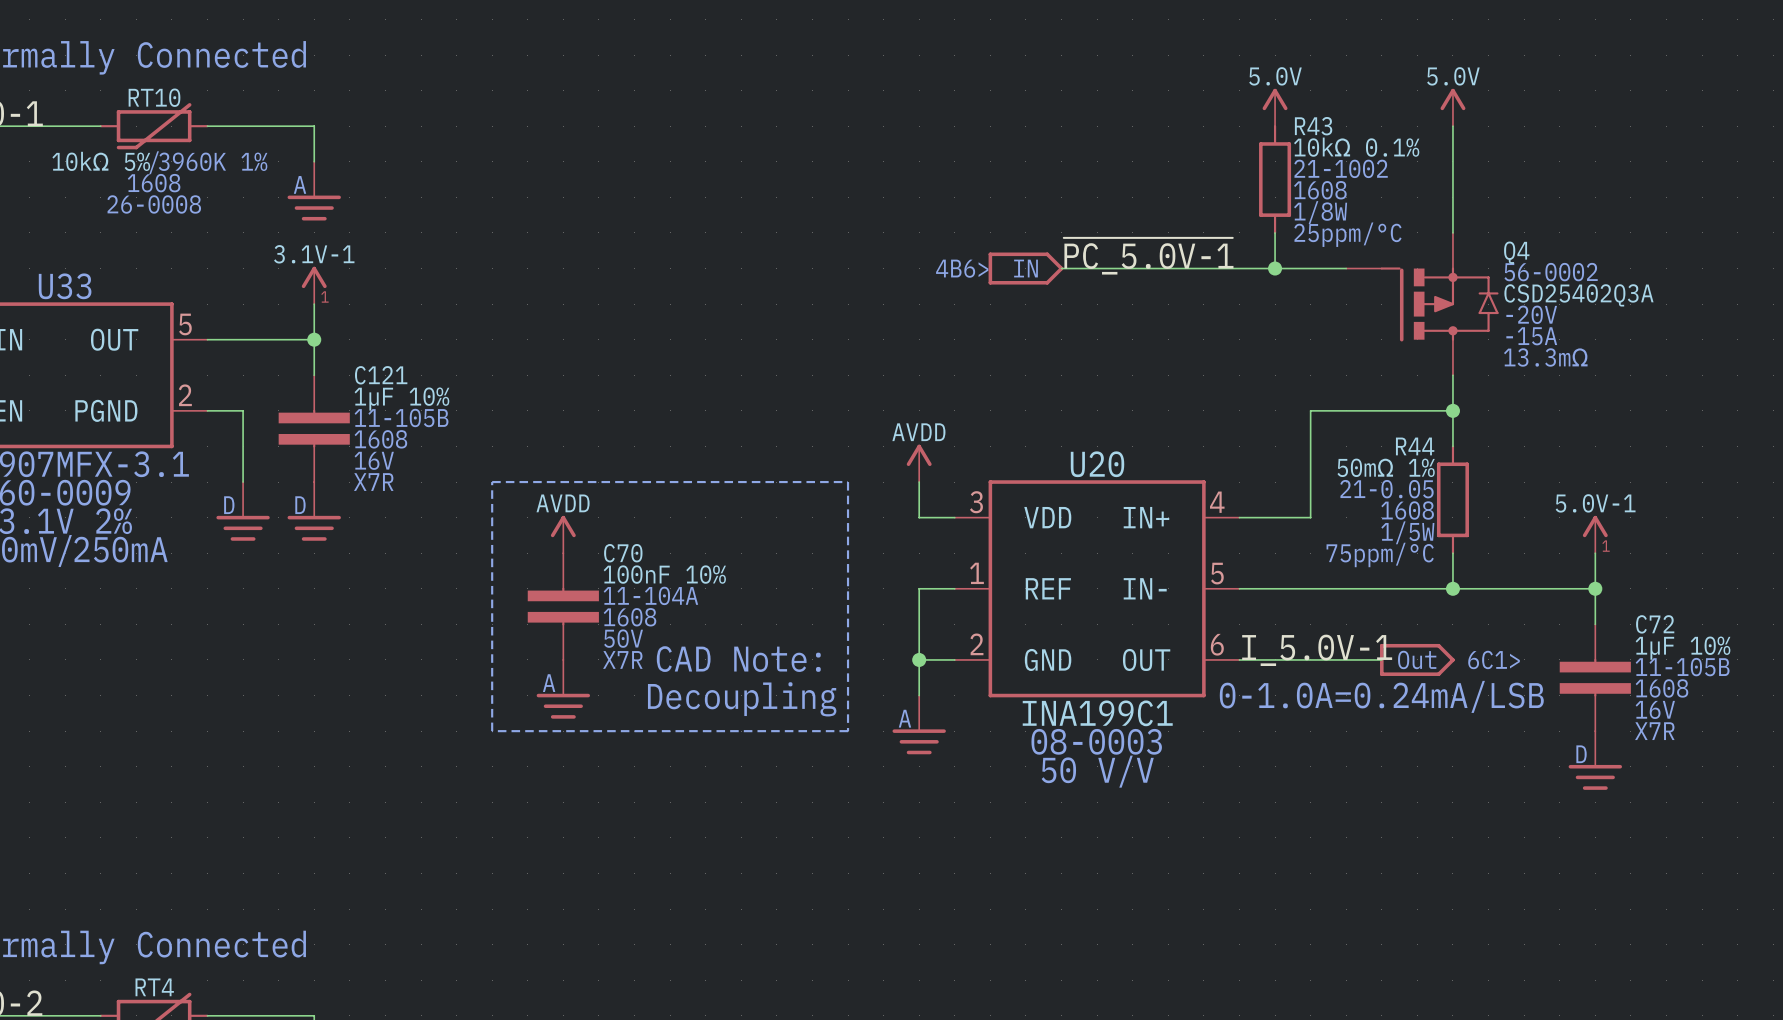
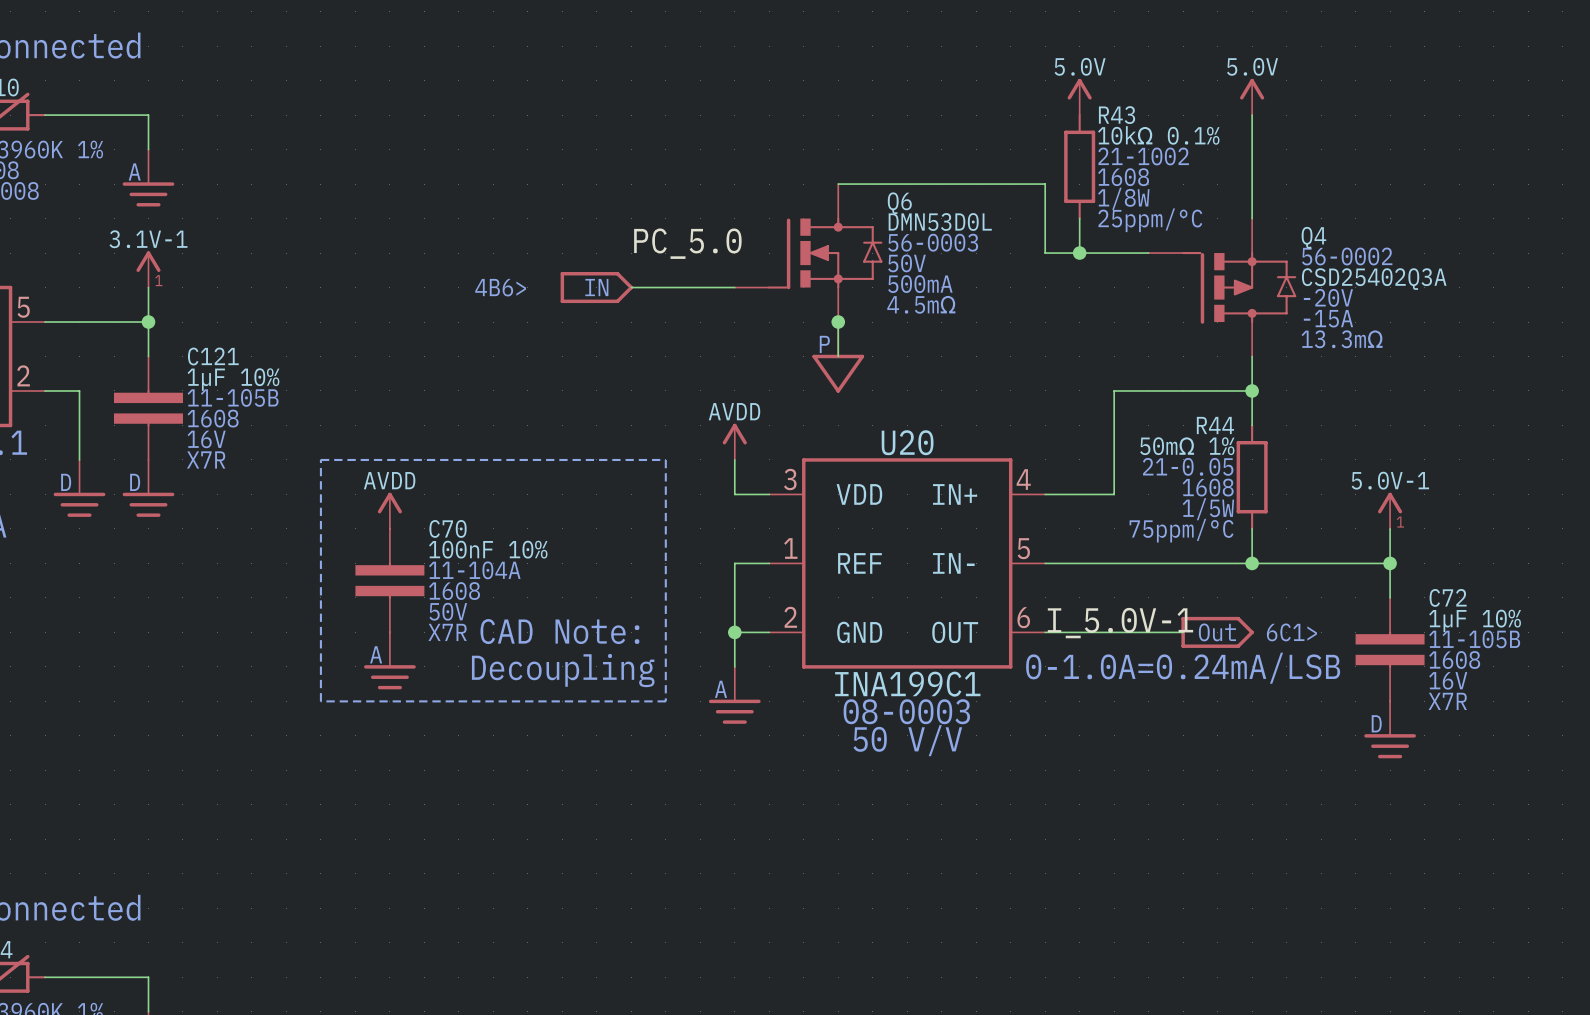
label: ~{PC_5.0V-1} (1148, 256) -> none
label: none -> PC_5.0 (687, 243)
text position: 4B6> (962, 268) -> 4B6> (500, 287)
Q6: none -> DMN53D0L (808, 253)
part position: (1025, 268) -> (596, 287)
wire: (1061, 268) (1239, 268) -> (838, 184) (1045, 184) (1045, 253)
wire: none -> (631, 287) (734, 287)
wire: none -> (838, 322) (838, 356)
junction: none -> (838, 322)
power symbol: none -> (838, 357)

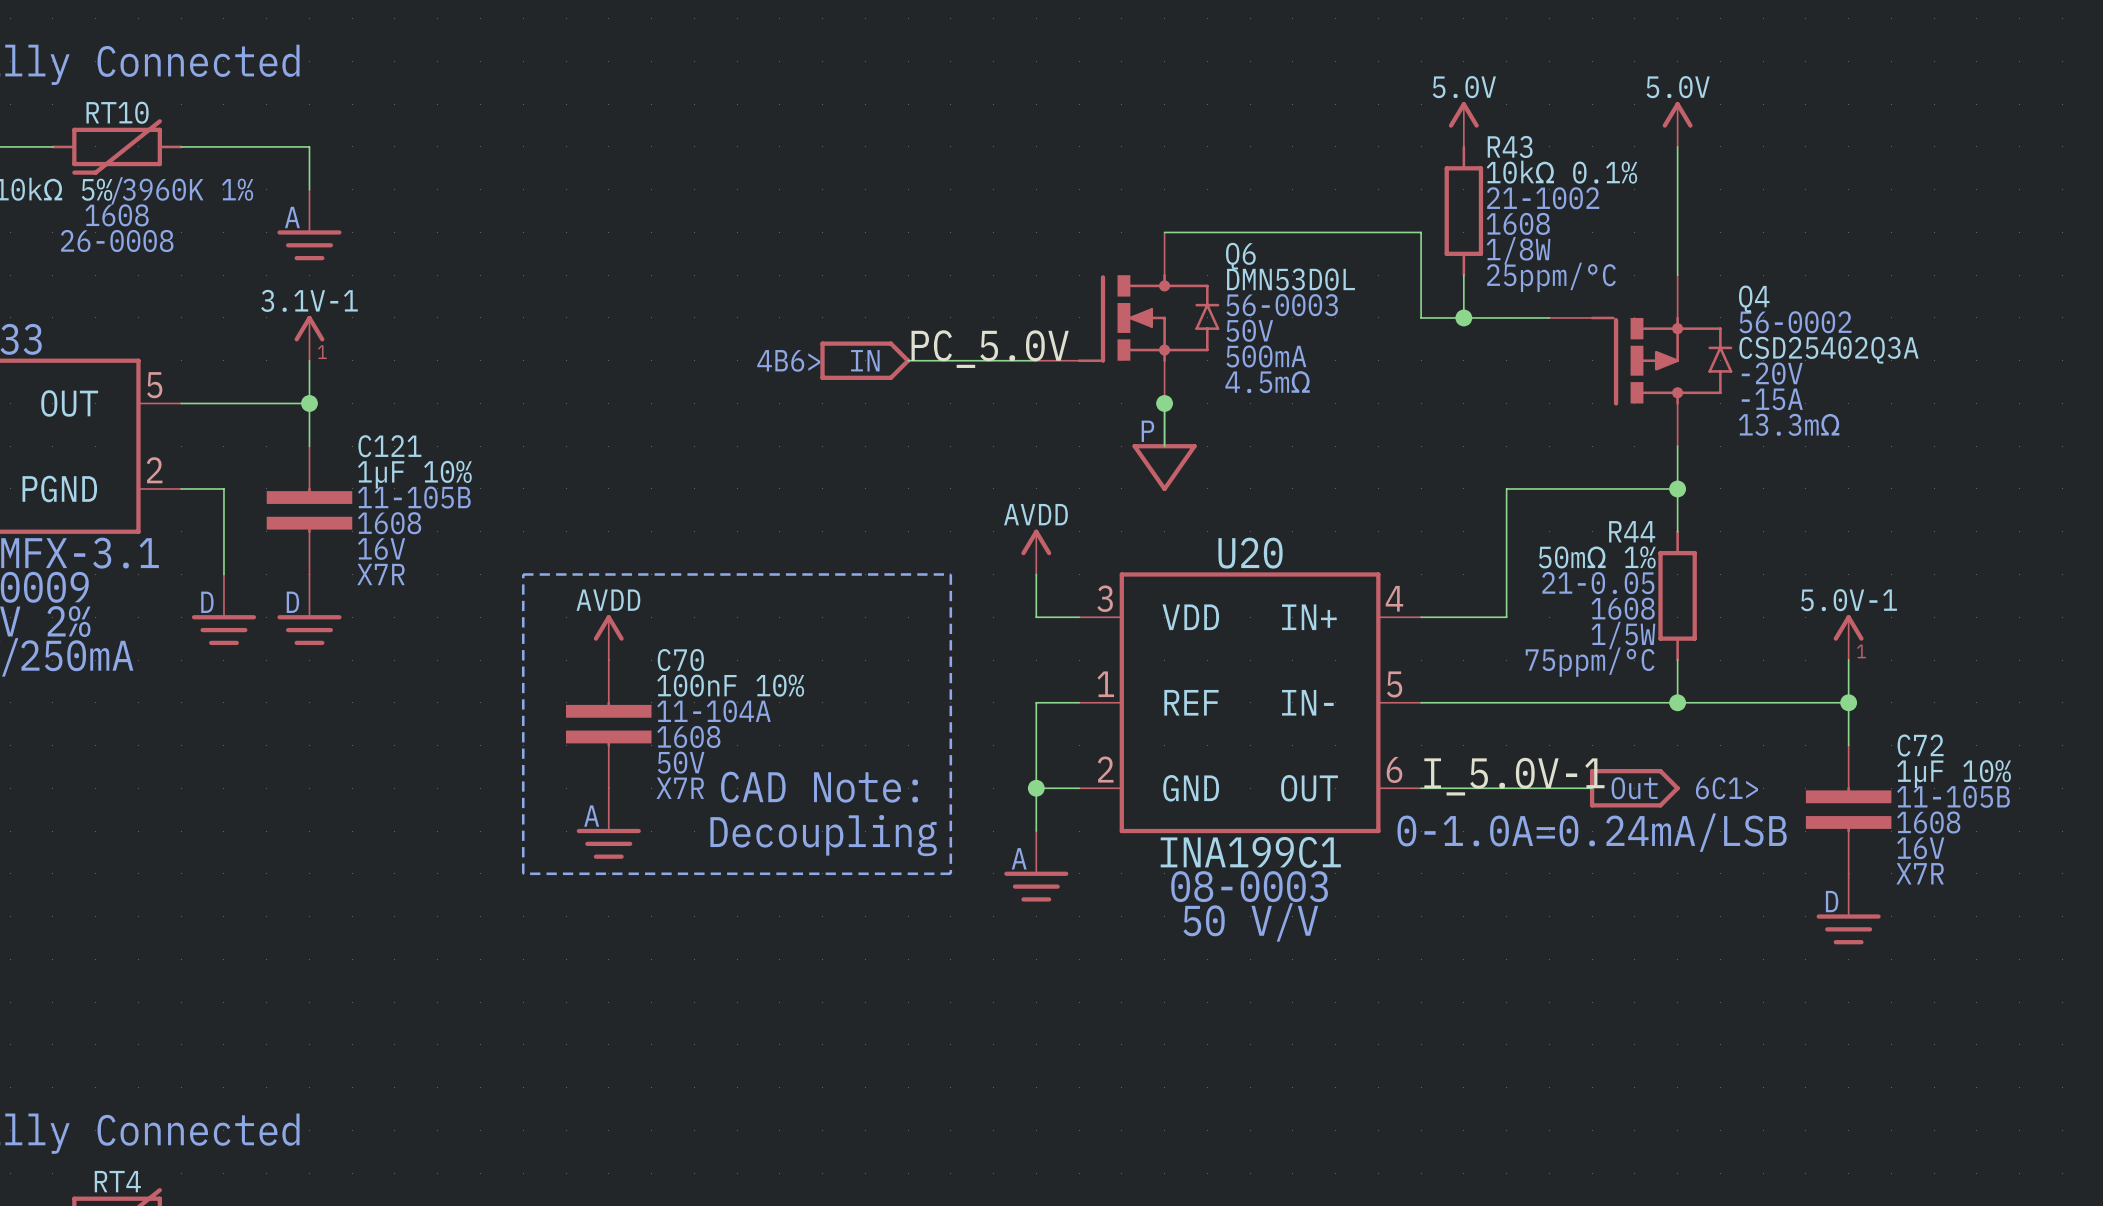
label: PC_5.0 (687, 243) -> PC_5.0V (990, 349)
text position: 4B6> (500, 287) -> 4B6> (788, 360)

